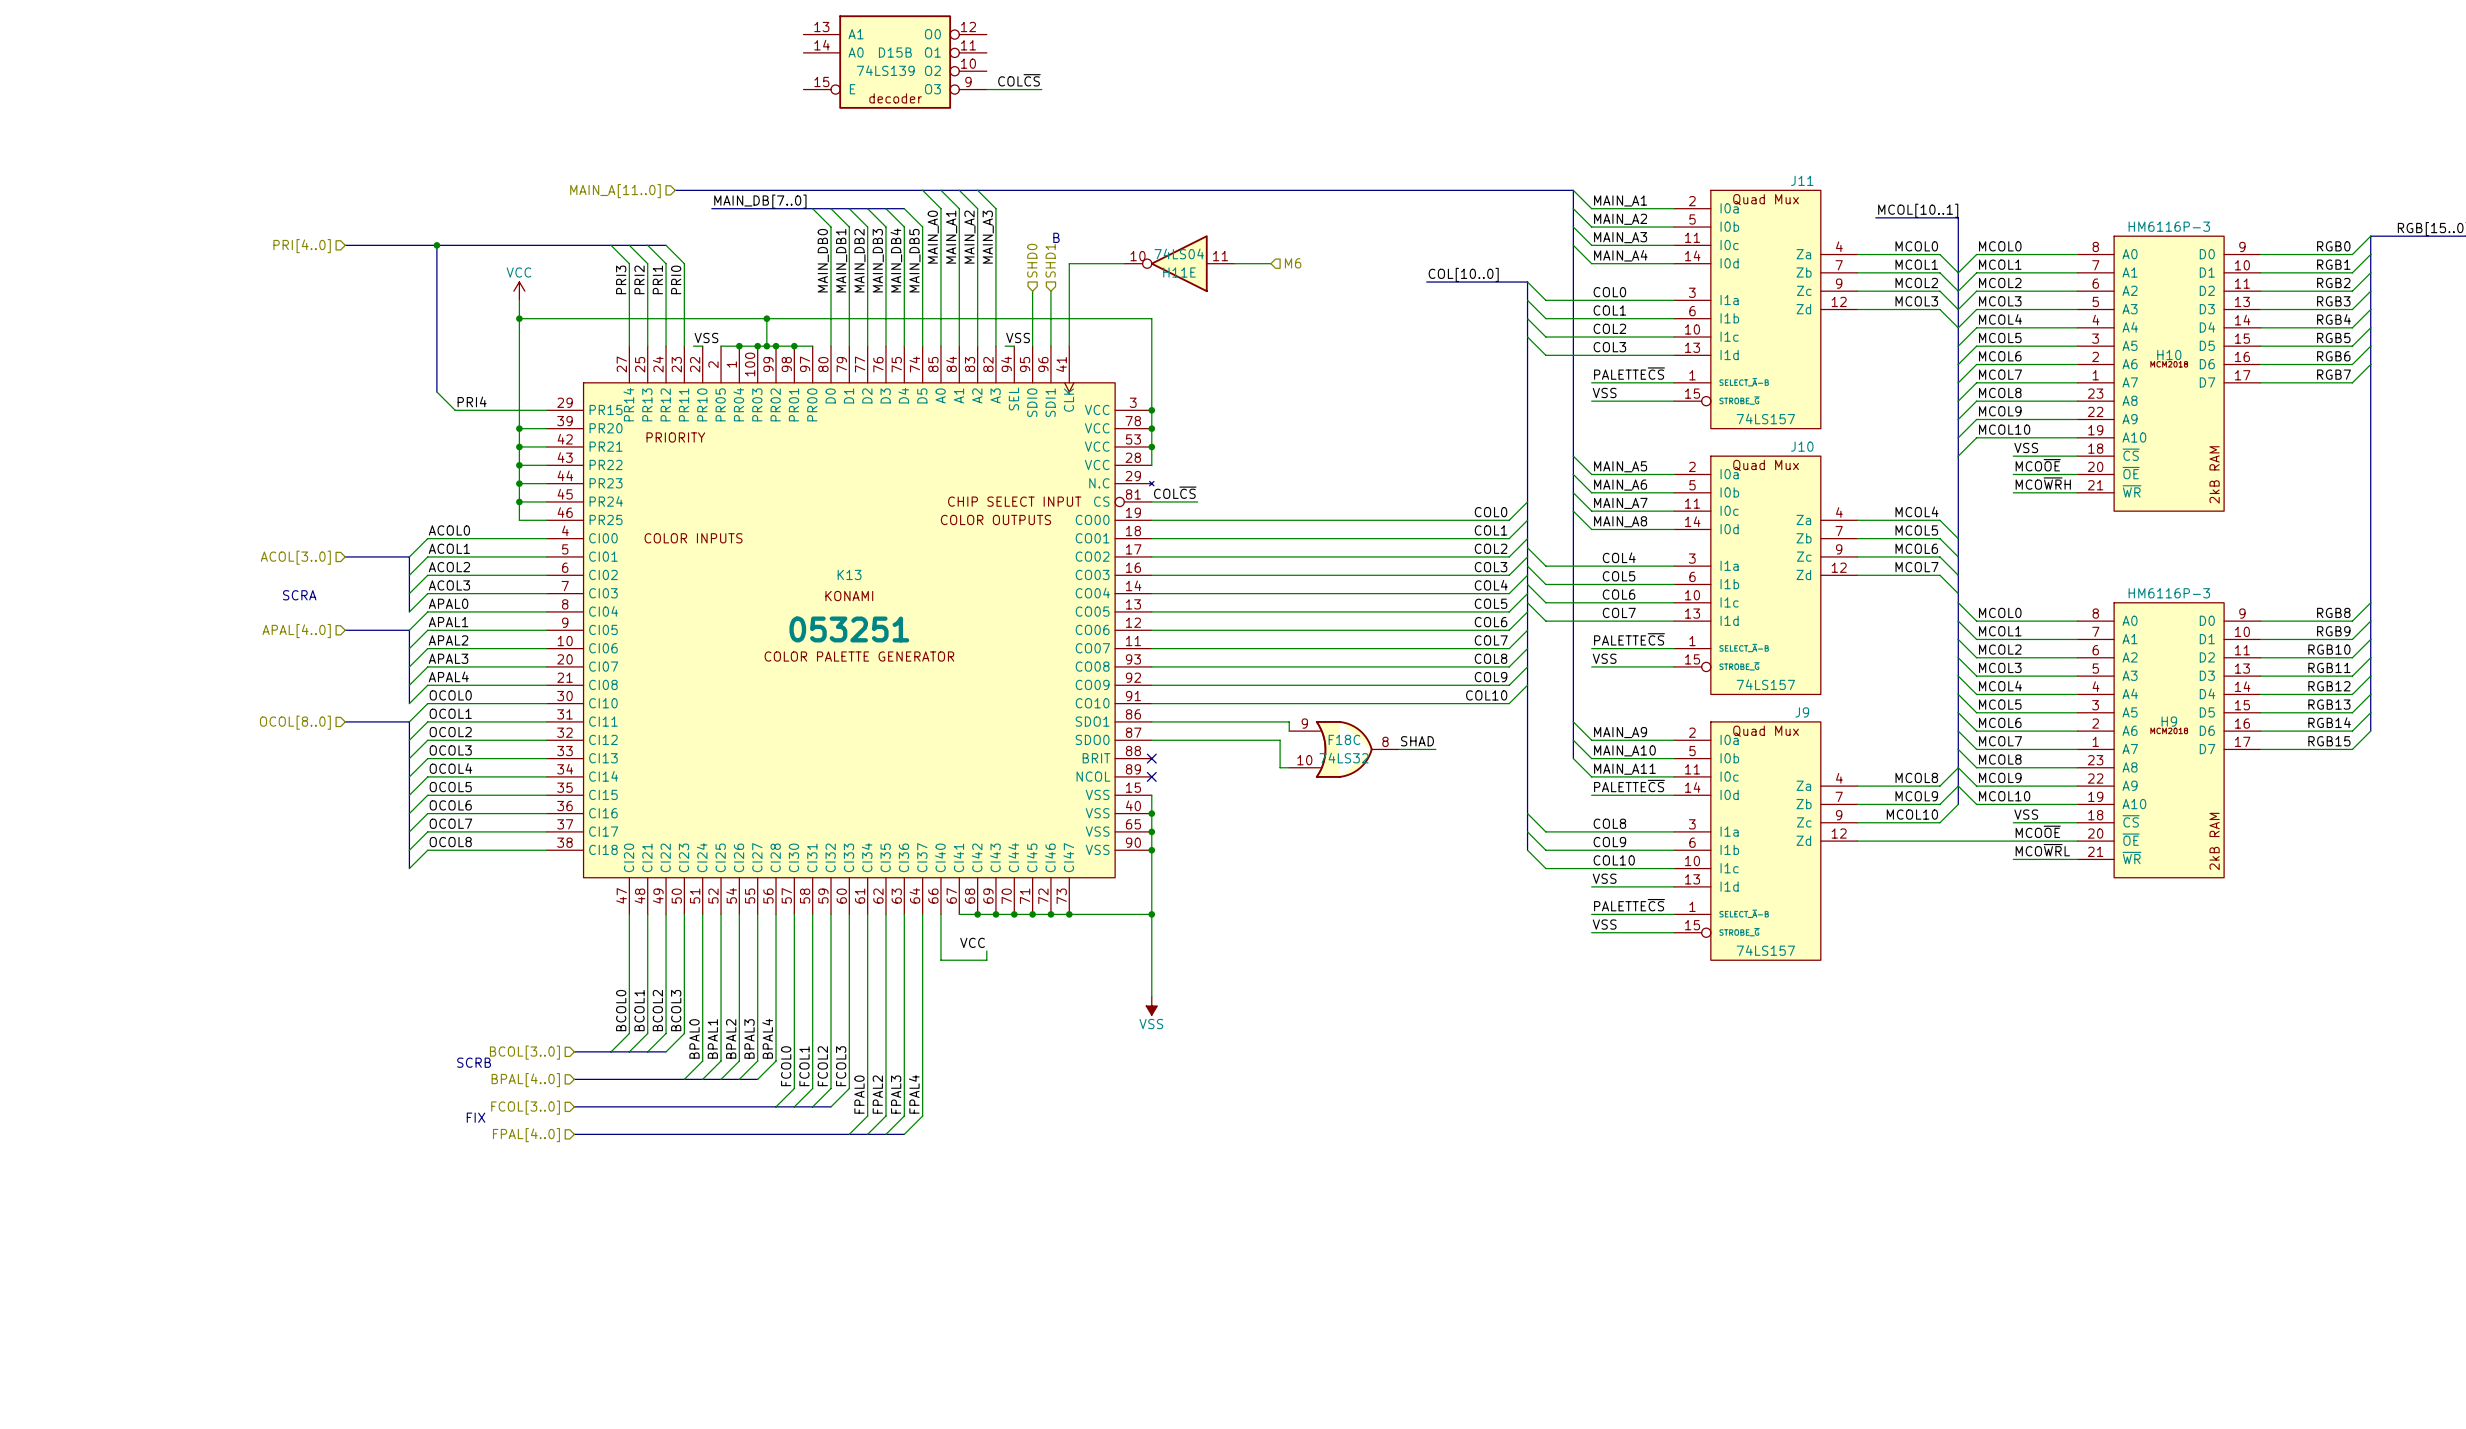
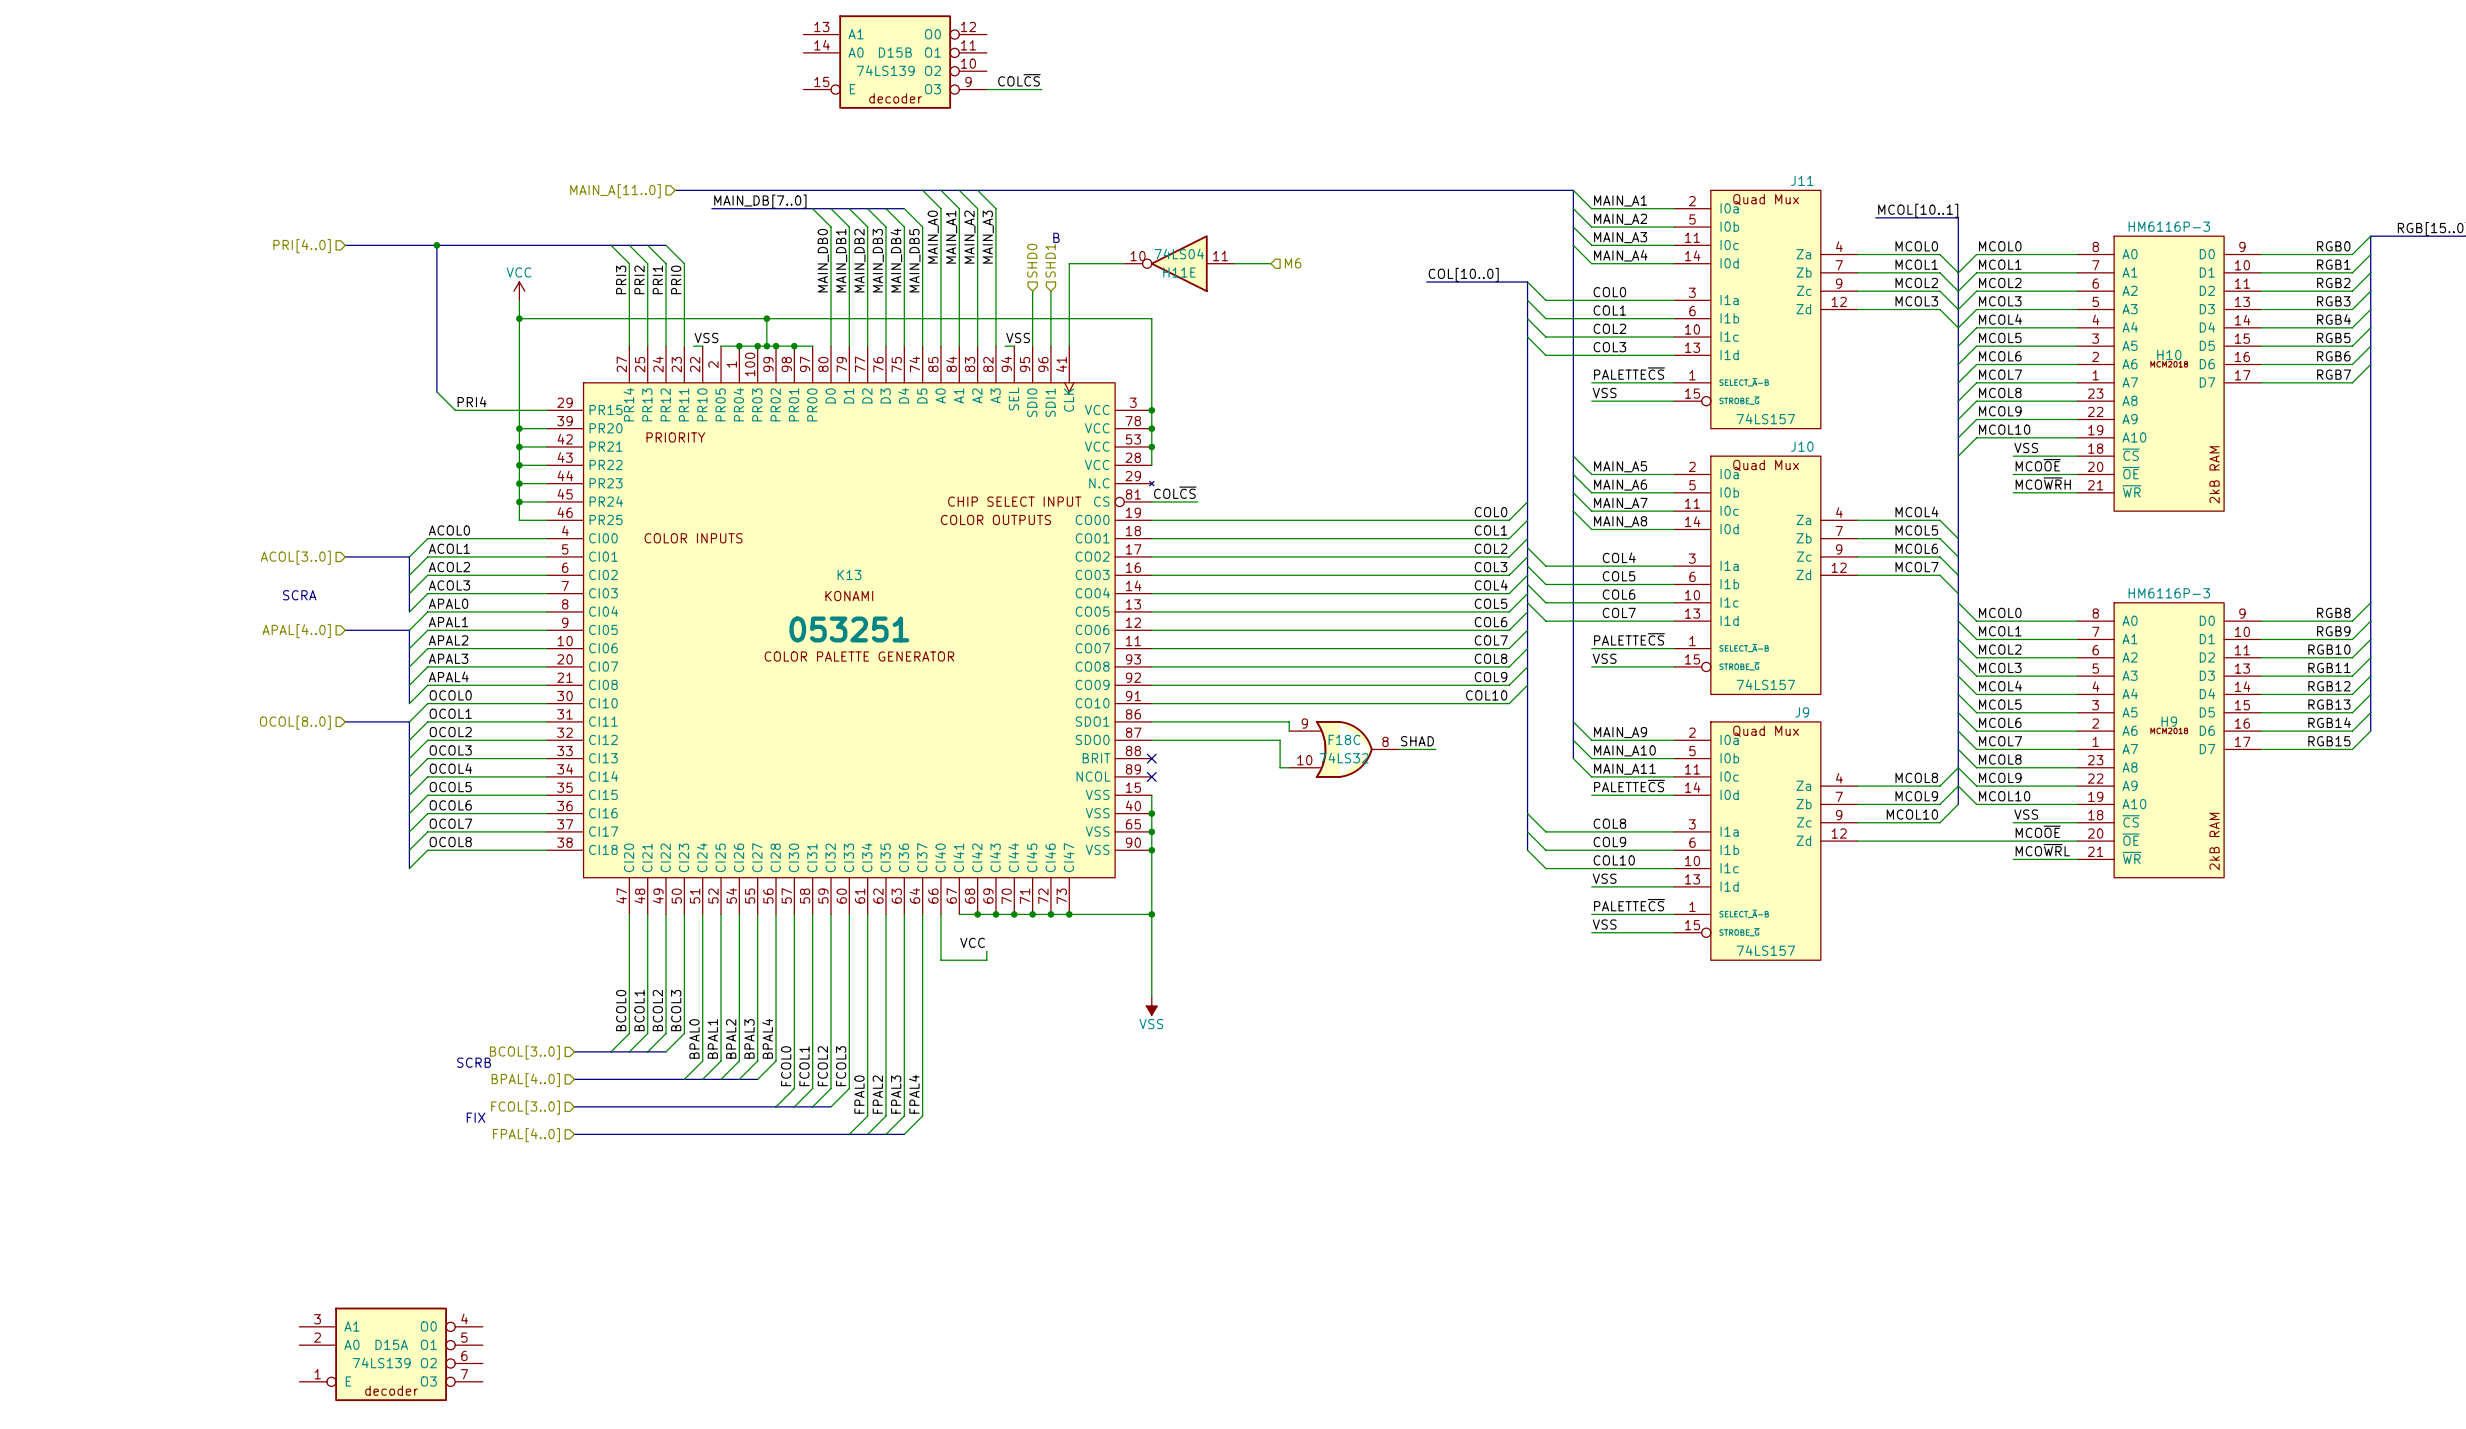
D15A: none -> 74LS139 (391, 1354)

